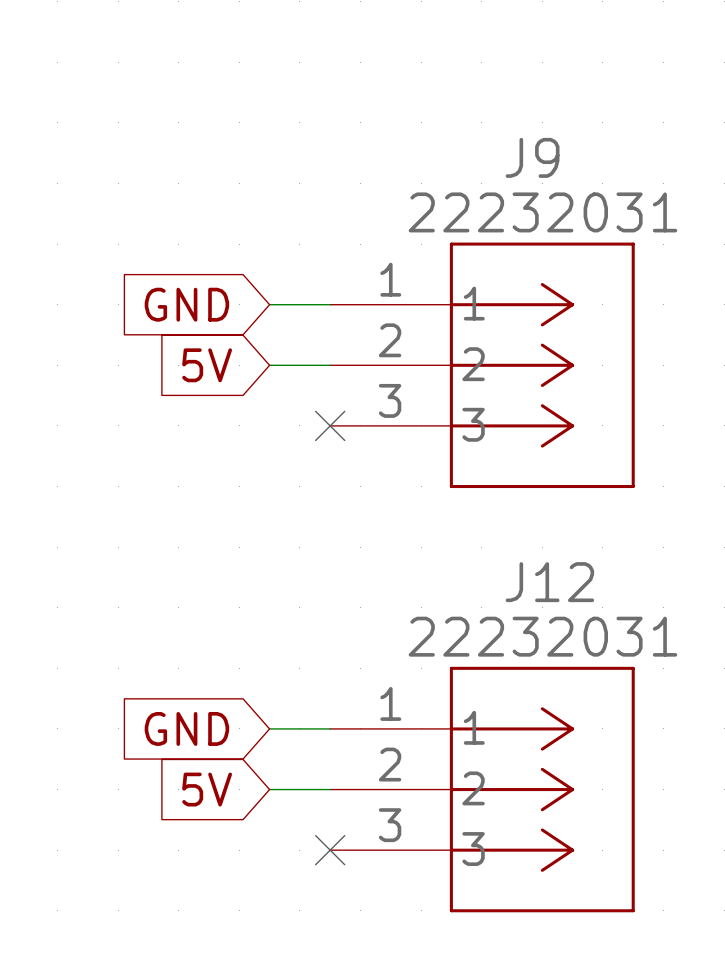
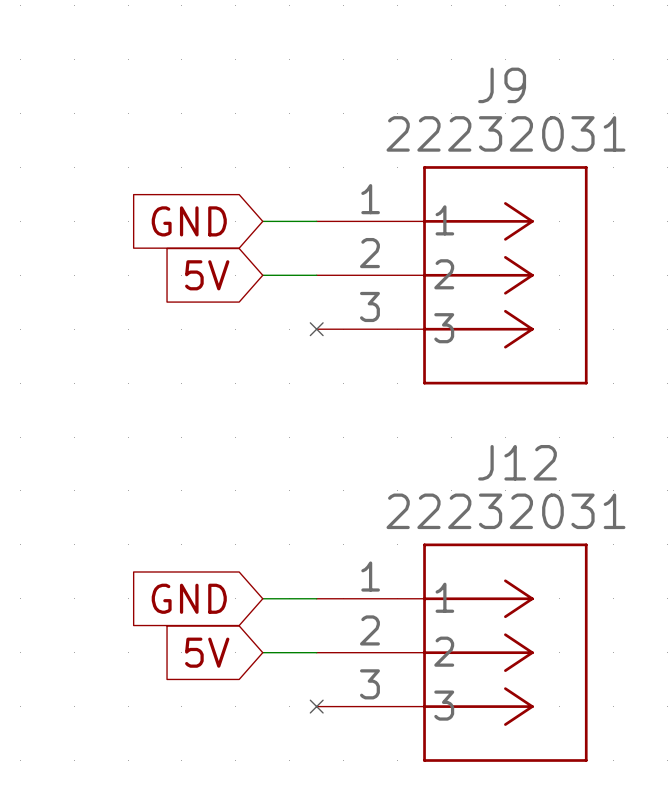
J9 symbol: [330, 242, 635, 489] -> [310, 166, 588, 385]
no-connect mark: (330, 425) -> none
J12 symbol: [330, 666, 635, 913] -> [310, 543, 588, 762]
no-connect mark: (330, 850) -> none

